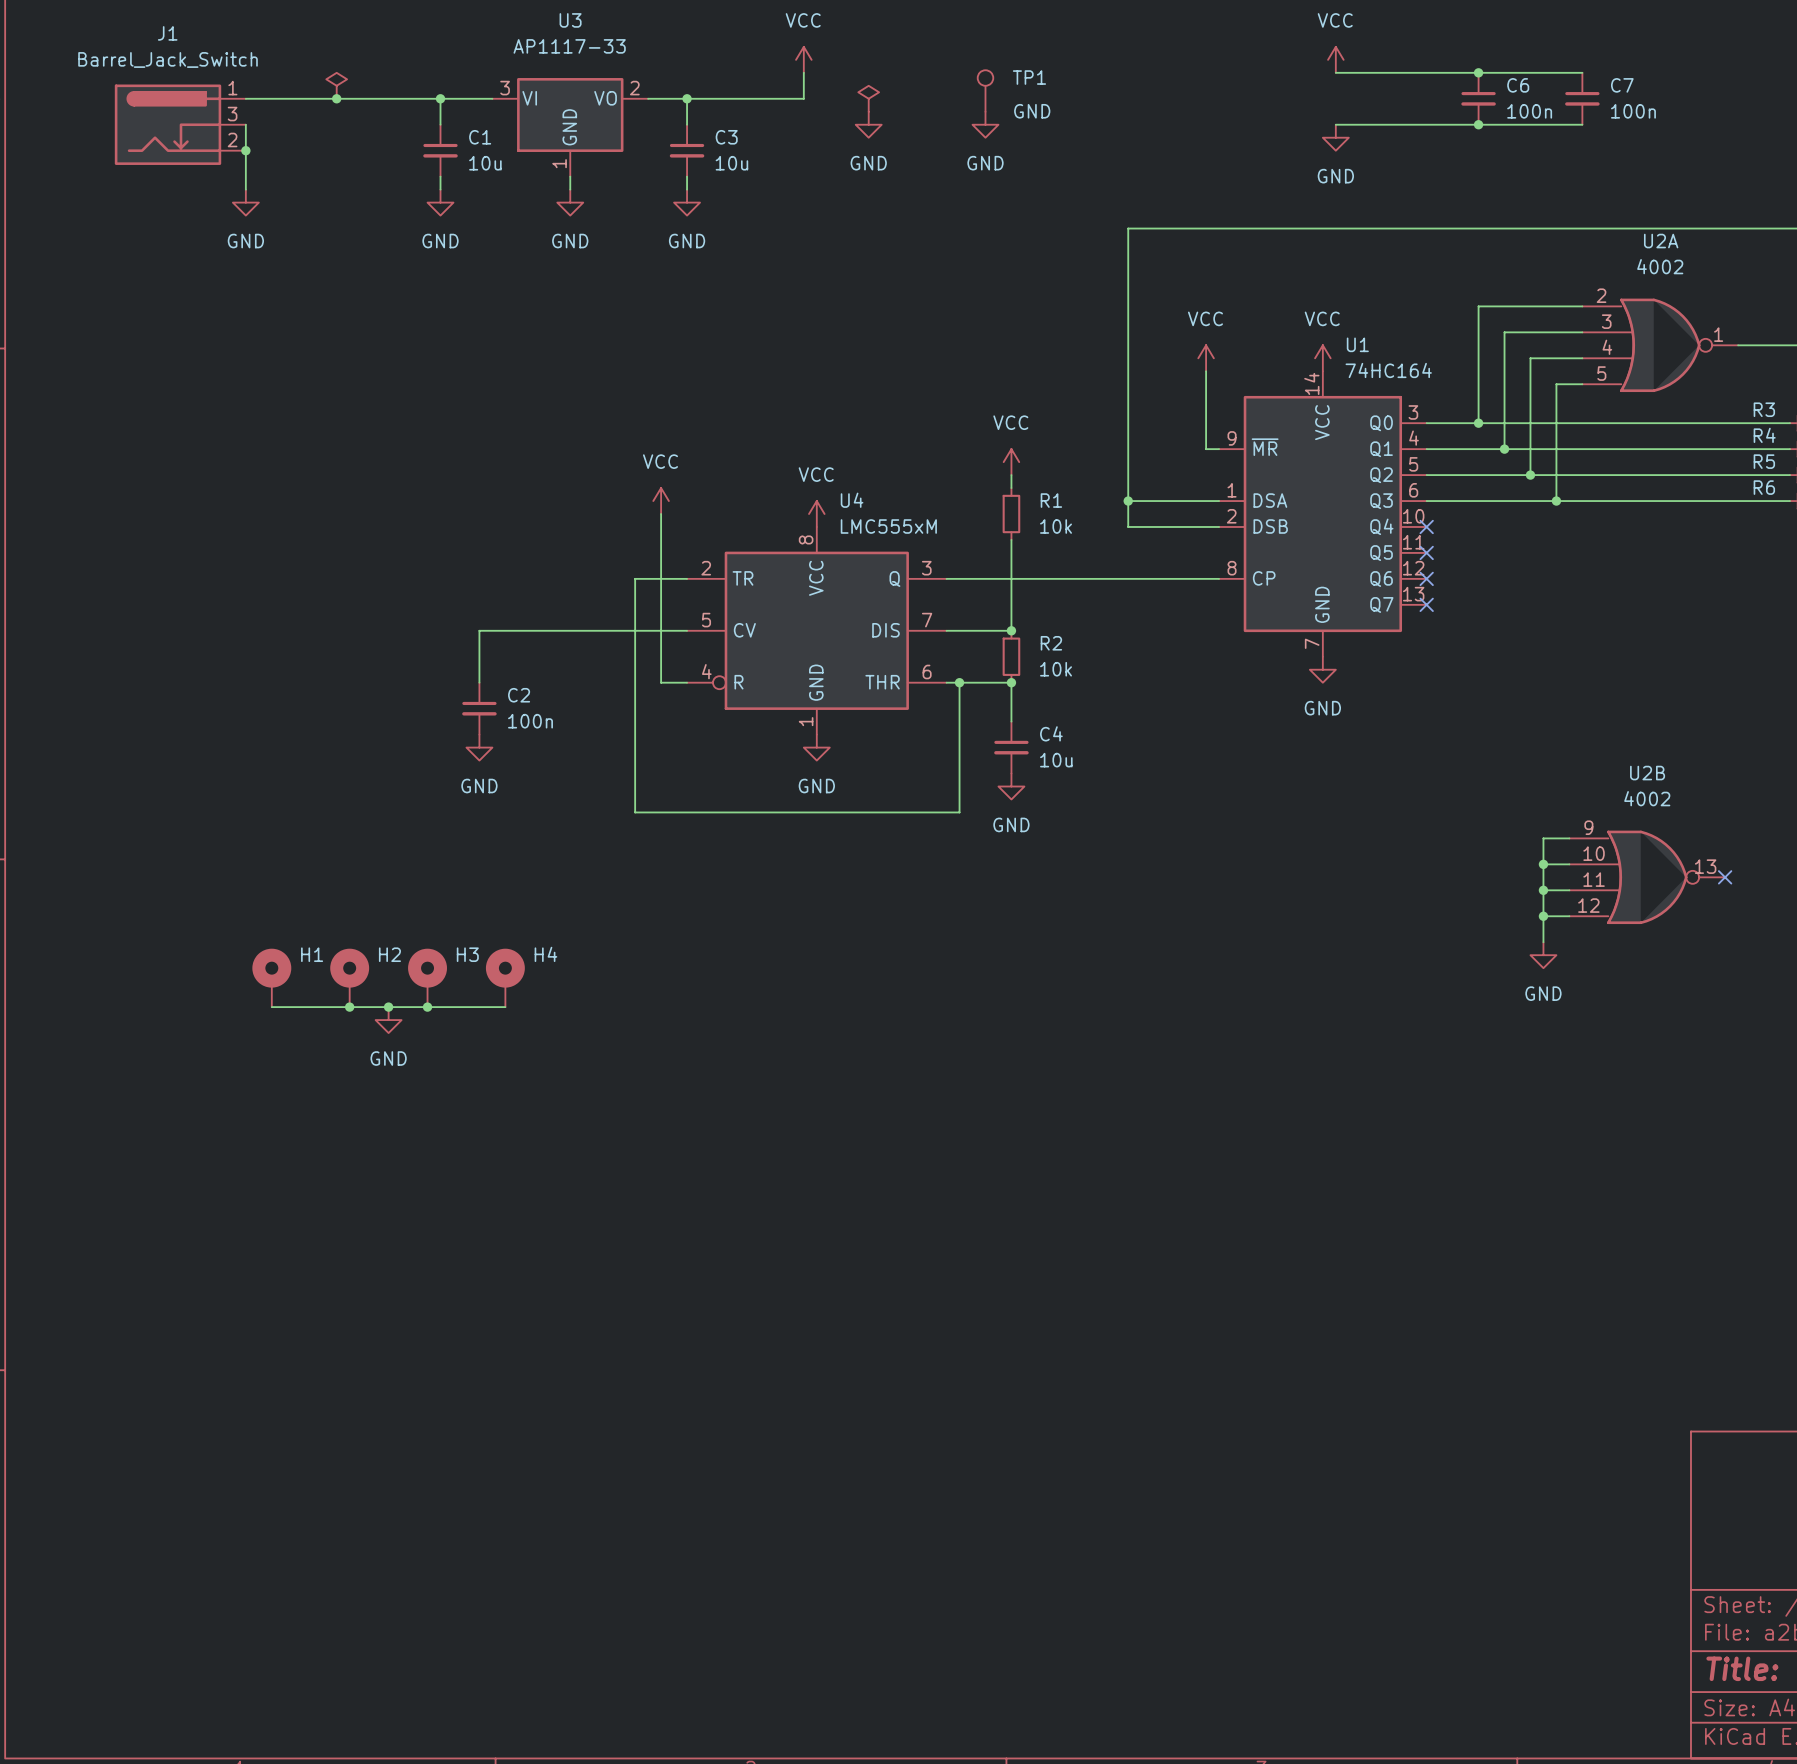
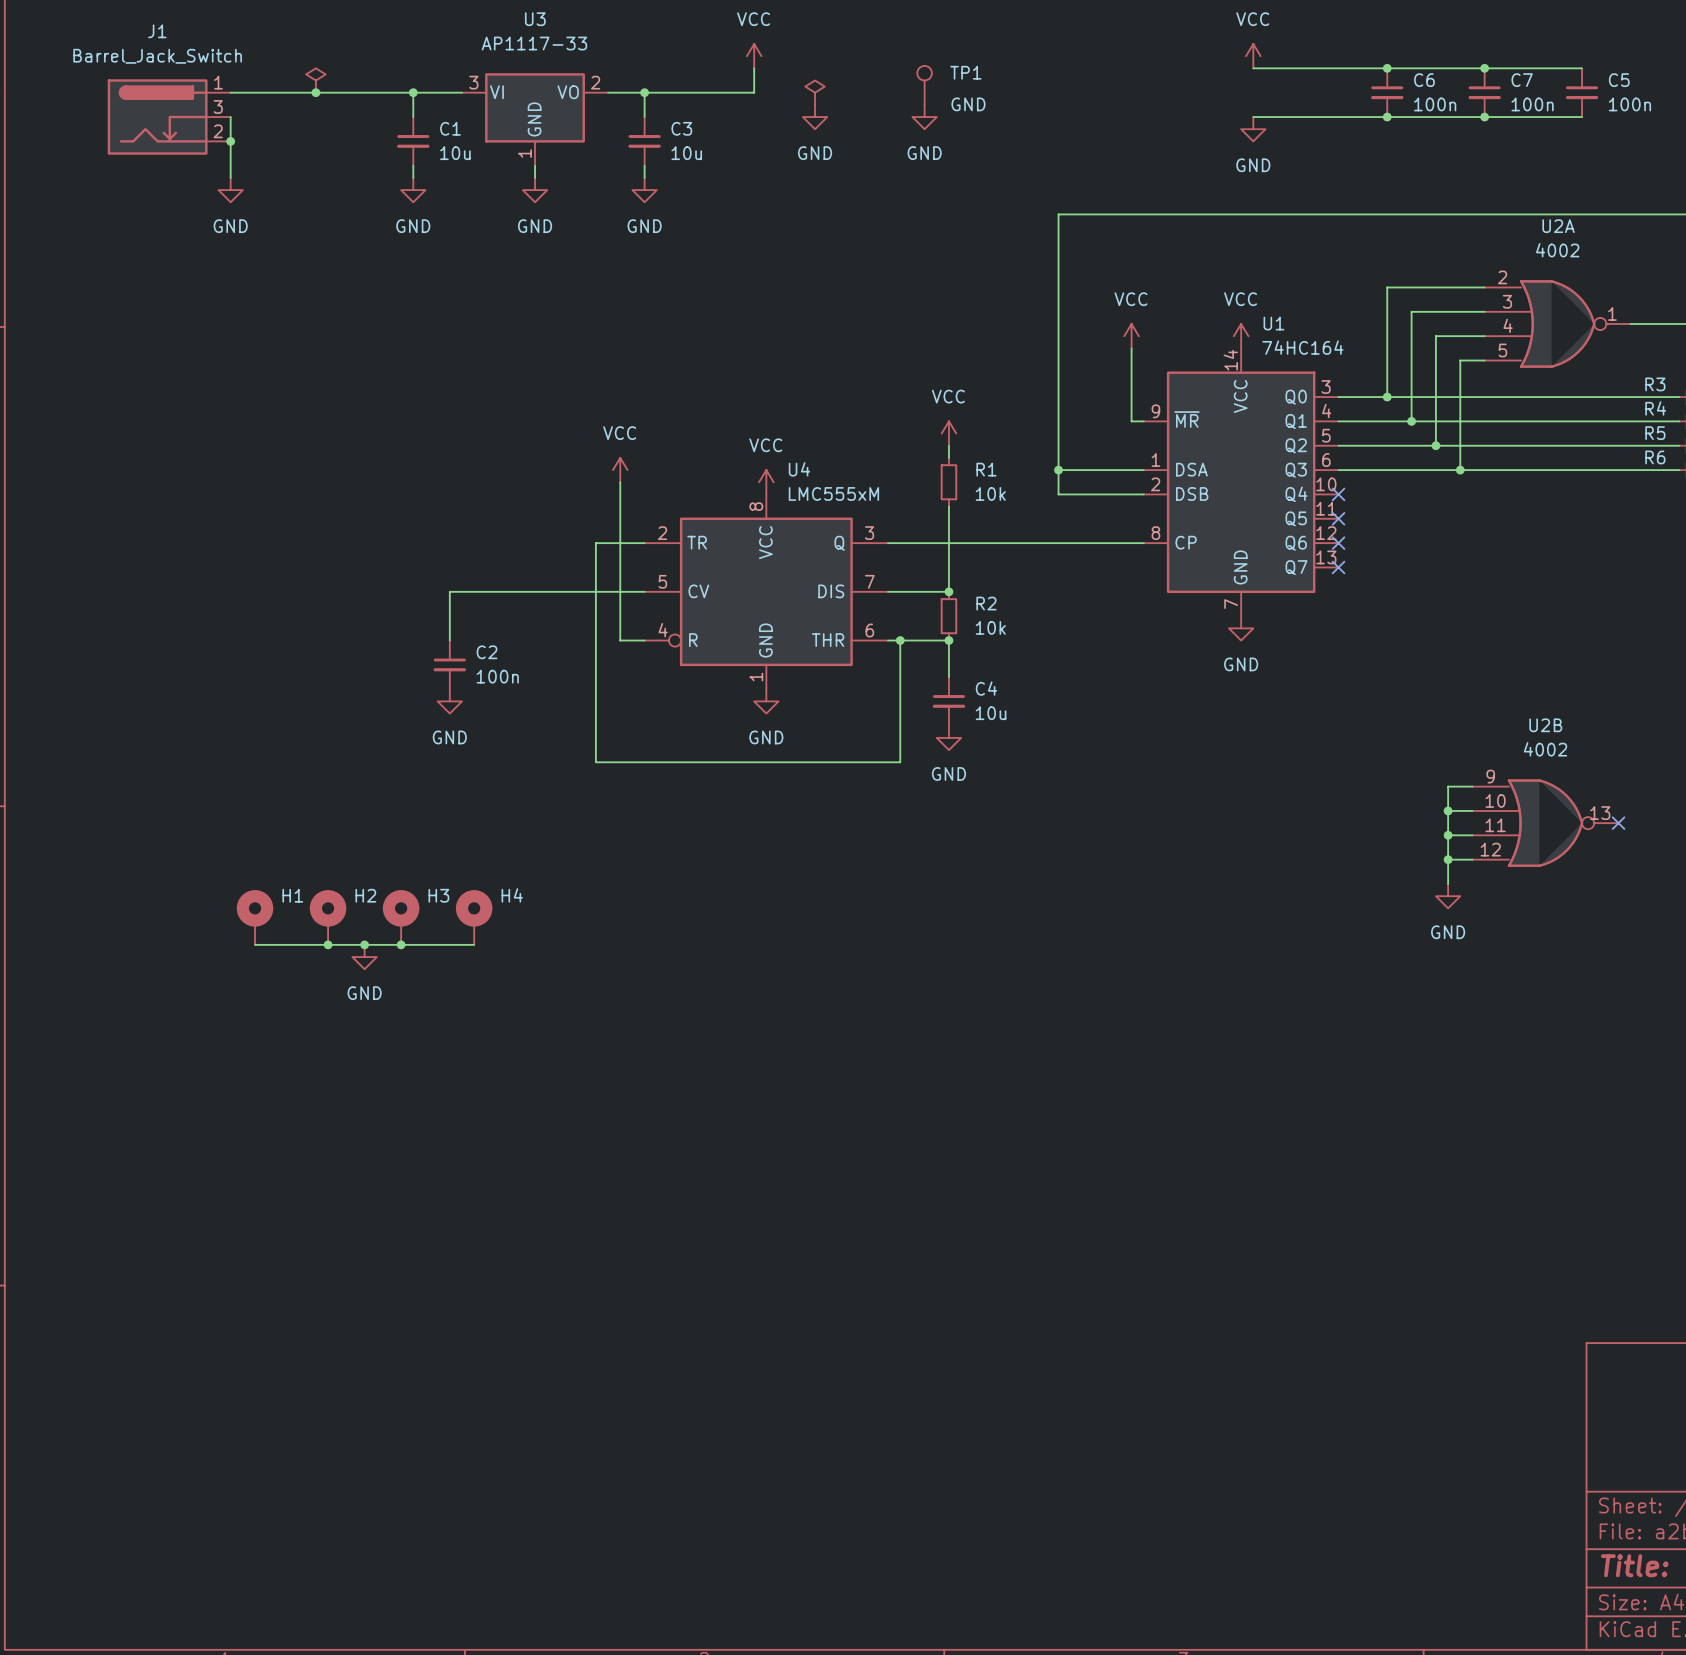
wire: none -> (1484, 68) (1582, 68)
junction: none -> (1484, 68)
C5: none -> 100n (1582, 92)
wire: none -> (1484, 117) (1582, 117)
junction: none -> (1484, 117)

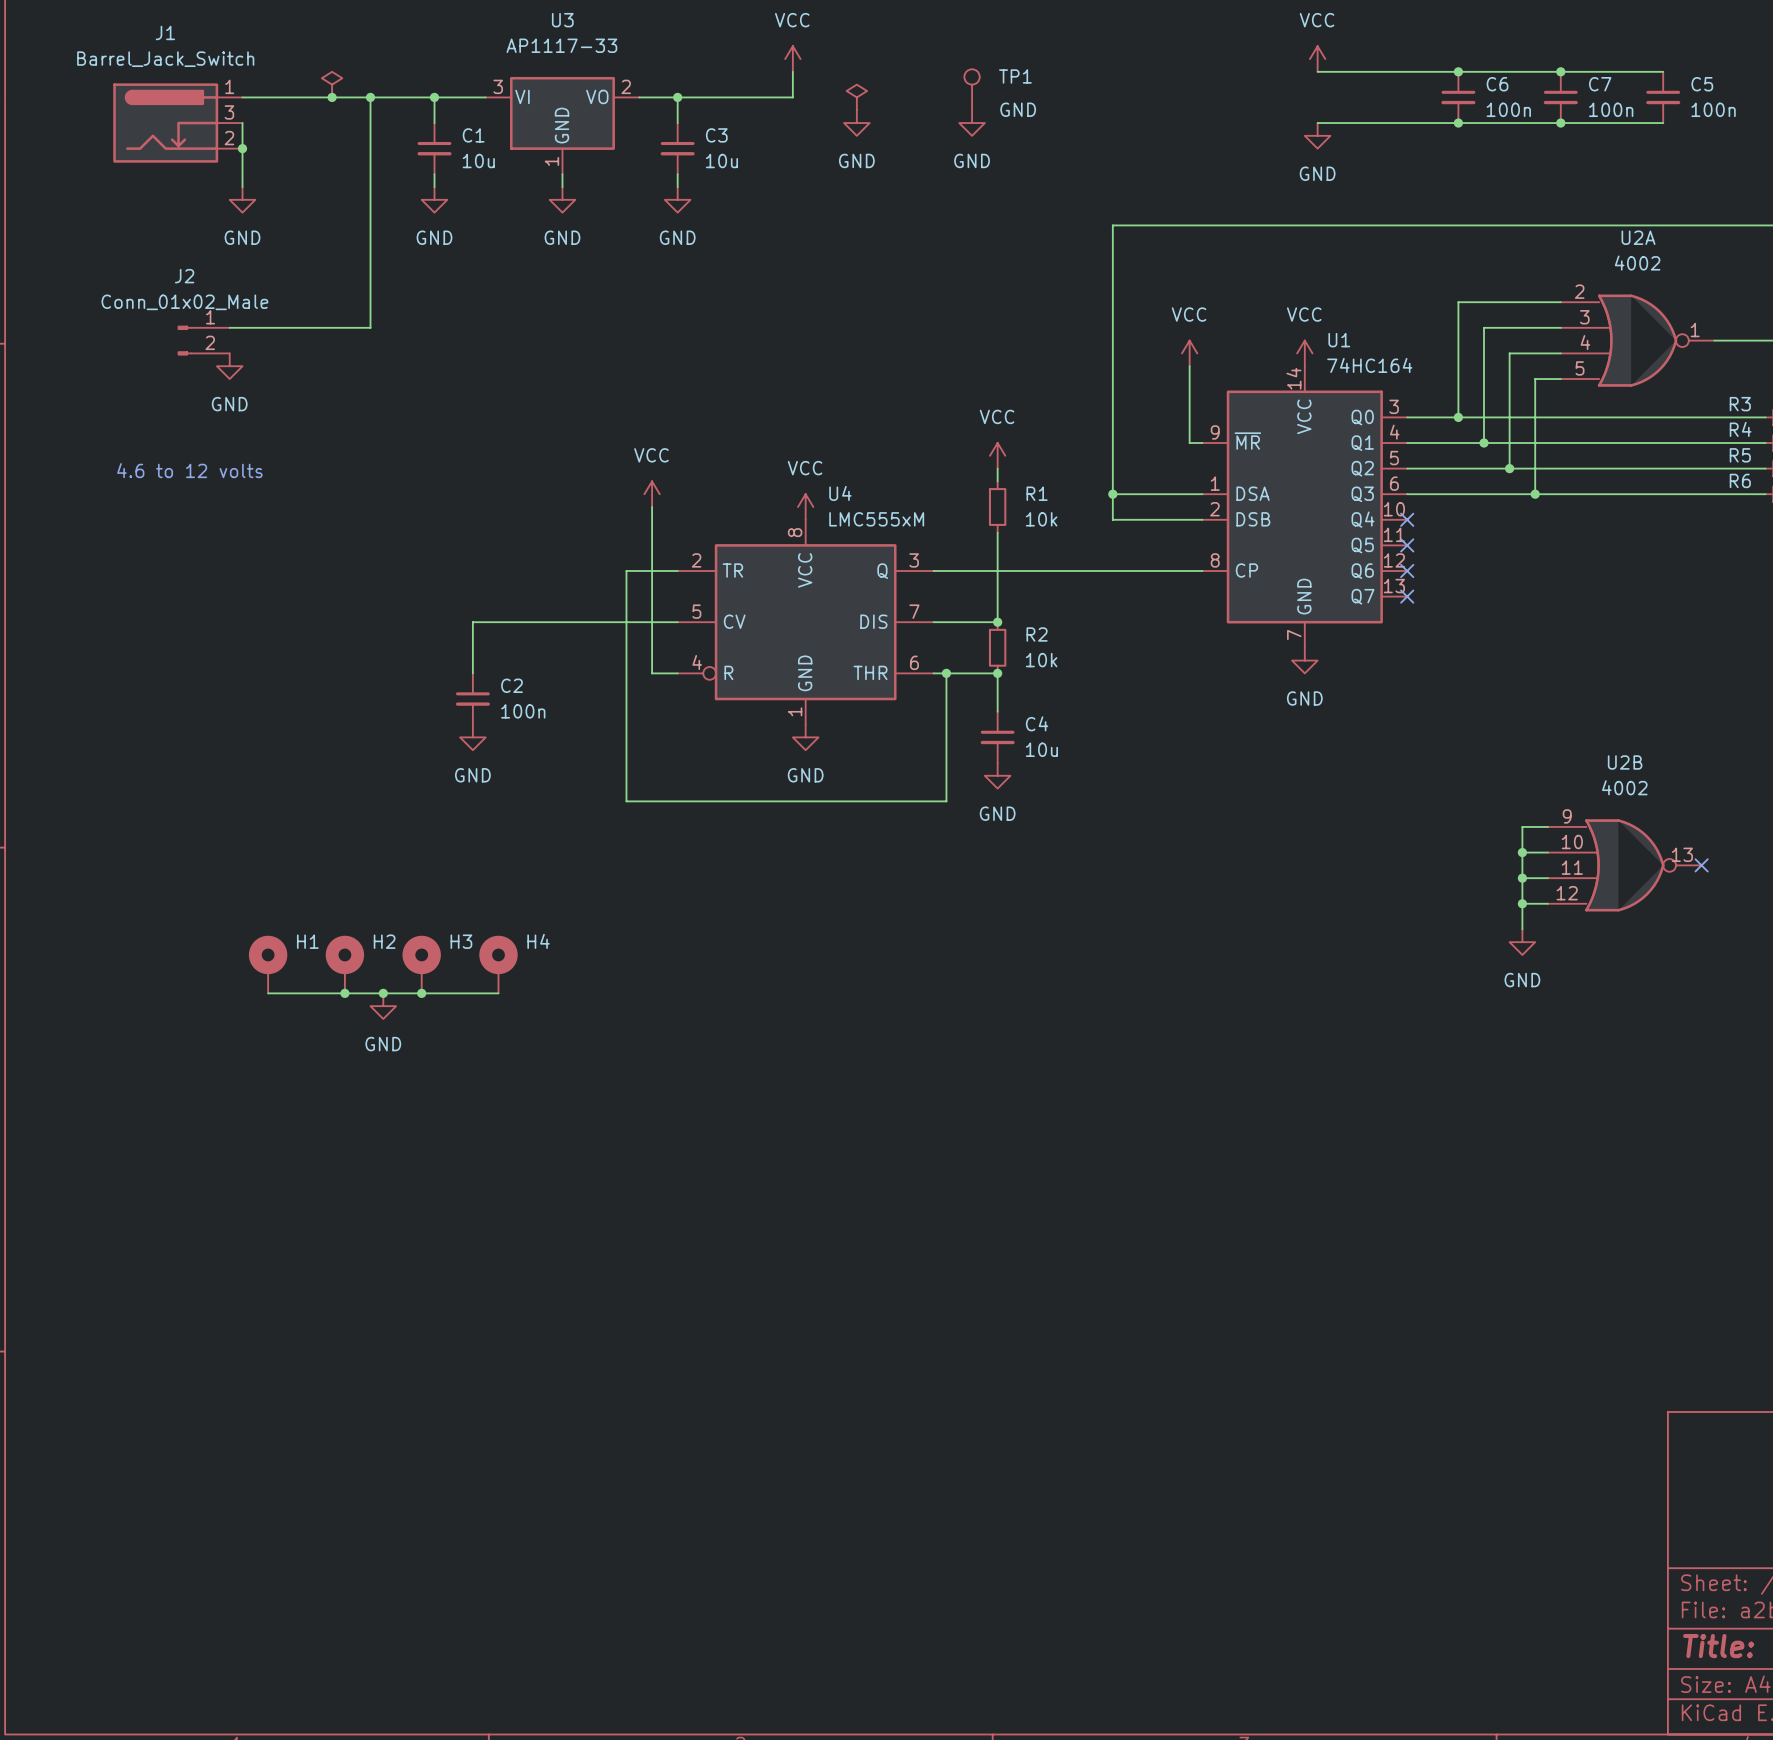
wire: none -> (370, 97) (370, 327) (229, 327)
junction: none -> (370, 97)
J2: none -> Conn_01x02_Male (203, 340)
power symbol: none -> GND (229, 366)
text: none -> 4.6 to 12 volts (189, 470)

